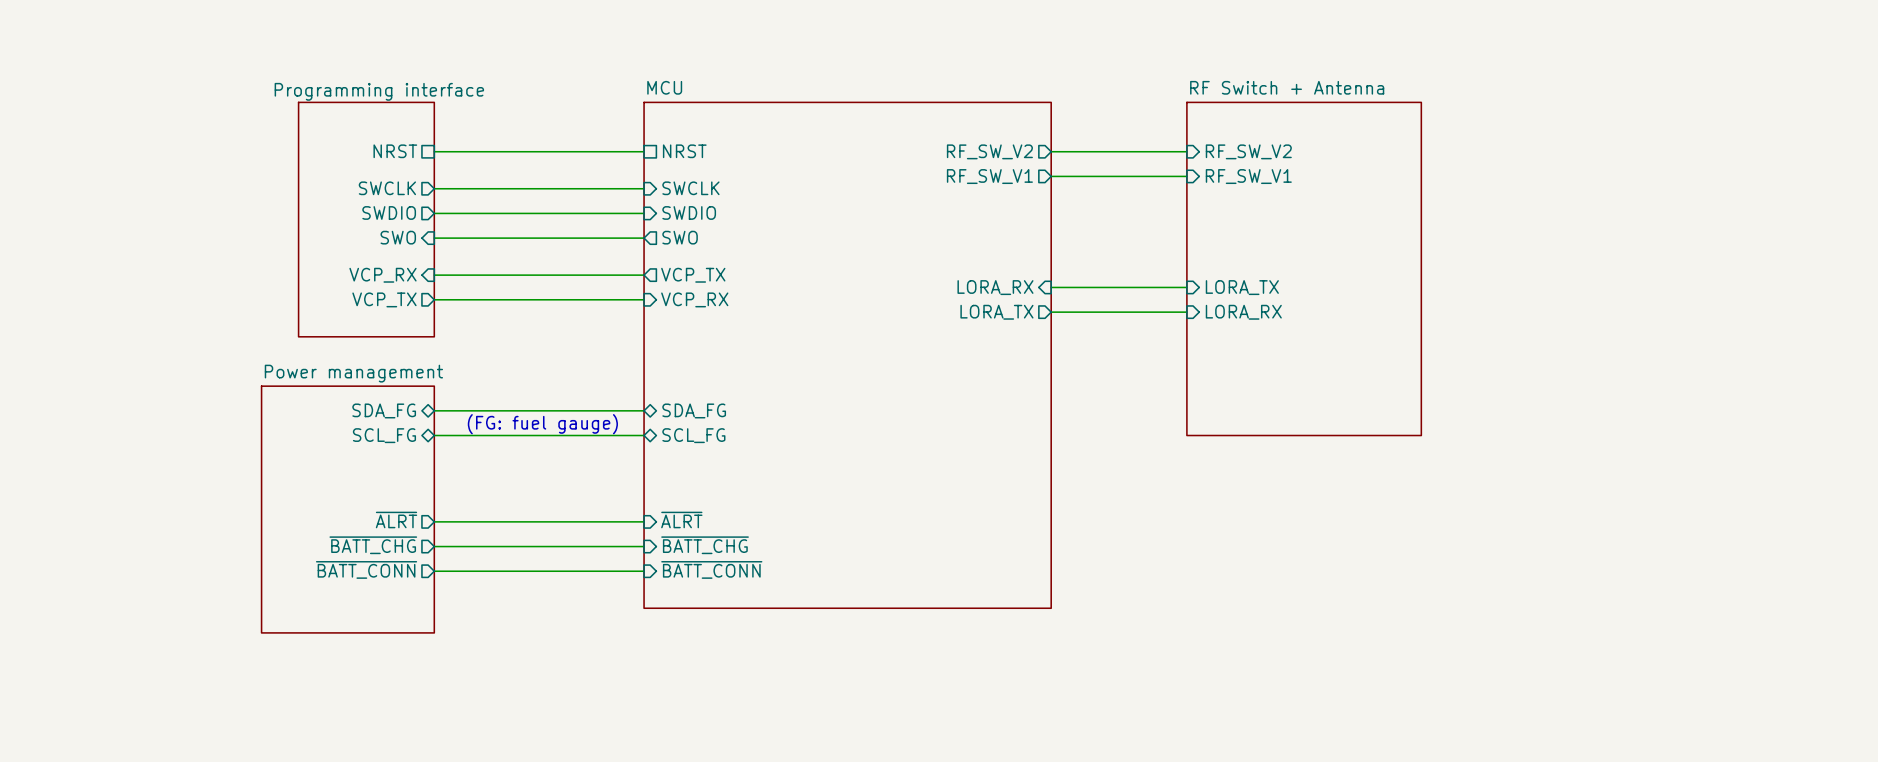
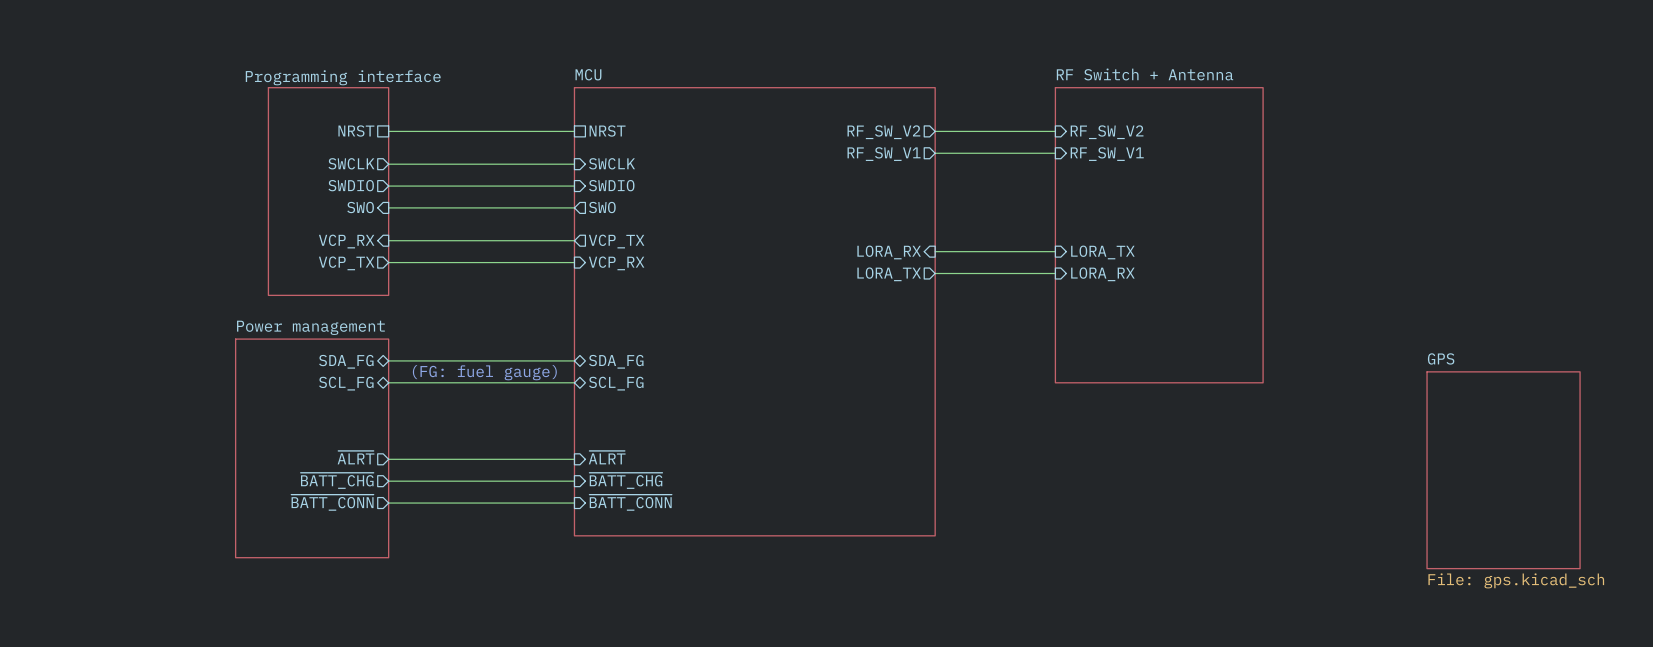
sheet GPS: none -> File: gps.kicad_sch (1503, 470)

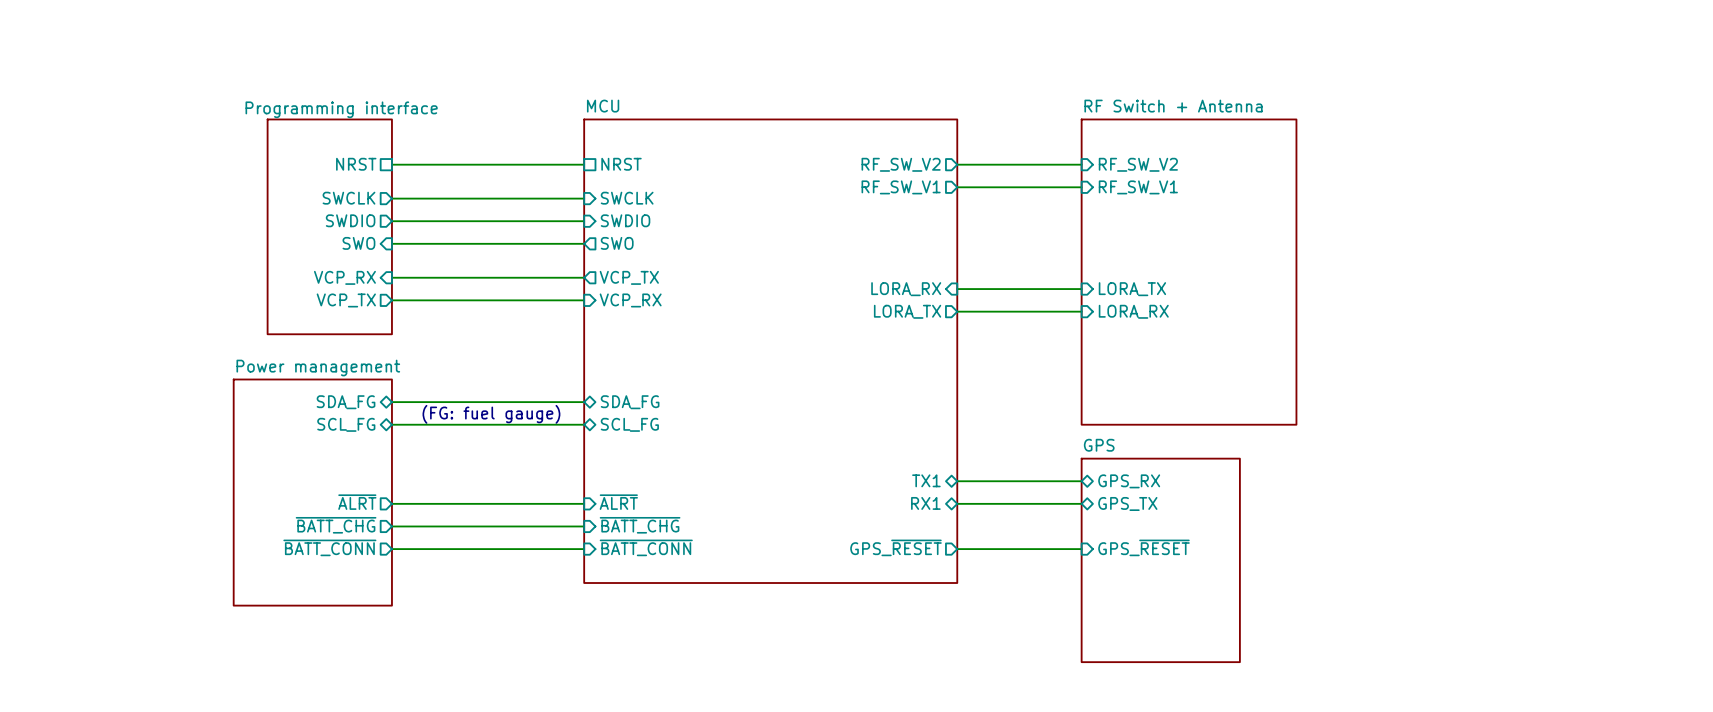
sheet pin: none -> TX1 (926, 480)
wire: none -> (957, 481) (1081, 481)
sheet pin: none -> GPS_RX (1129, 481)
sheet pin: none -> RX1 (925, 503)
wire: none -> (957, 503) (1081, 503)
sheet pin: none -> GPS_TX (1127, 503)
sheet GPS: File: gps.kicad_sch (1503, 470) -> none
sheet pin: none -> GPS_~{RESET} (895, 547)
sheet pin: none -> GPS_~{RESET} (1143, 547)
wire: none -> (957, 549) (1081, 549)
sheet GPS: none -> (1160, 560)

